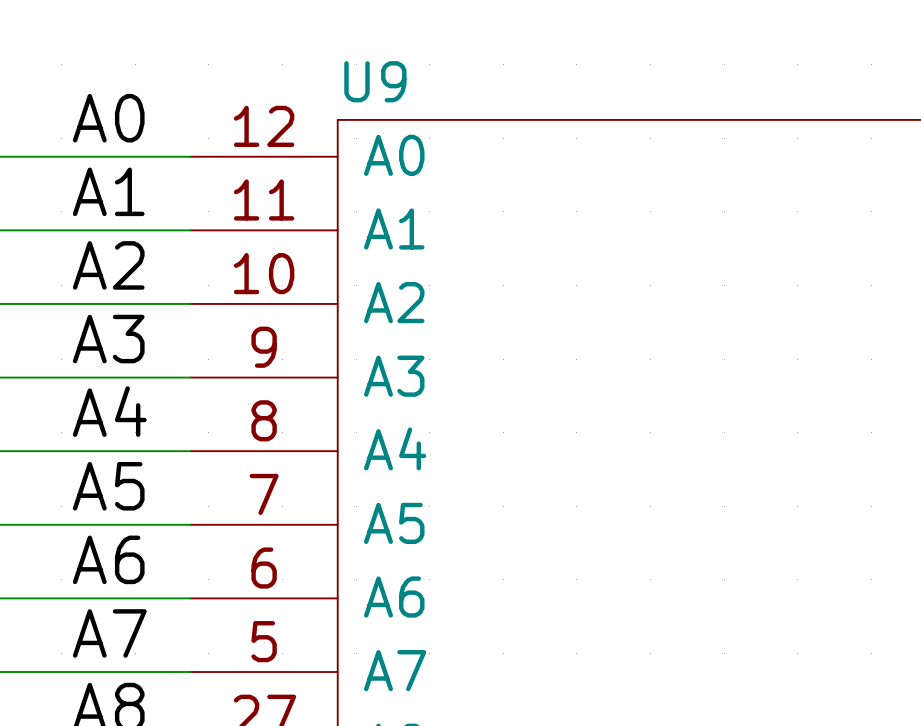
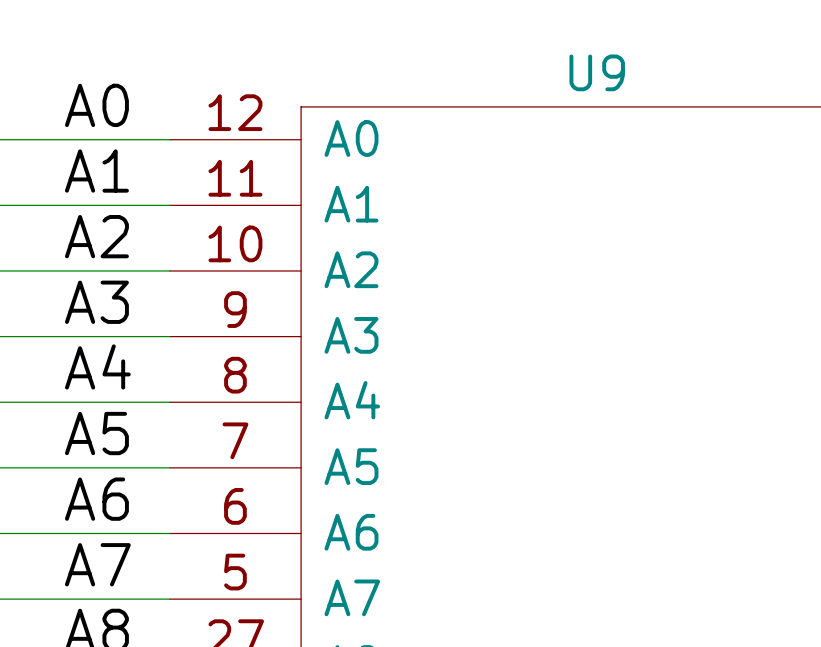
U9 name position: U9 (375, 81) -> U9 (597, 72)

